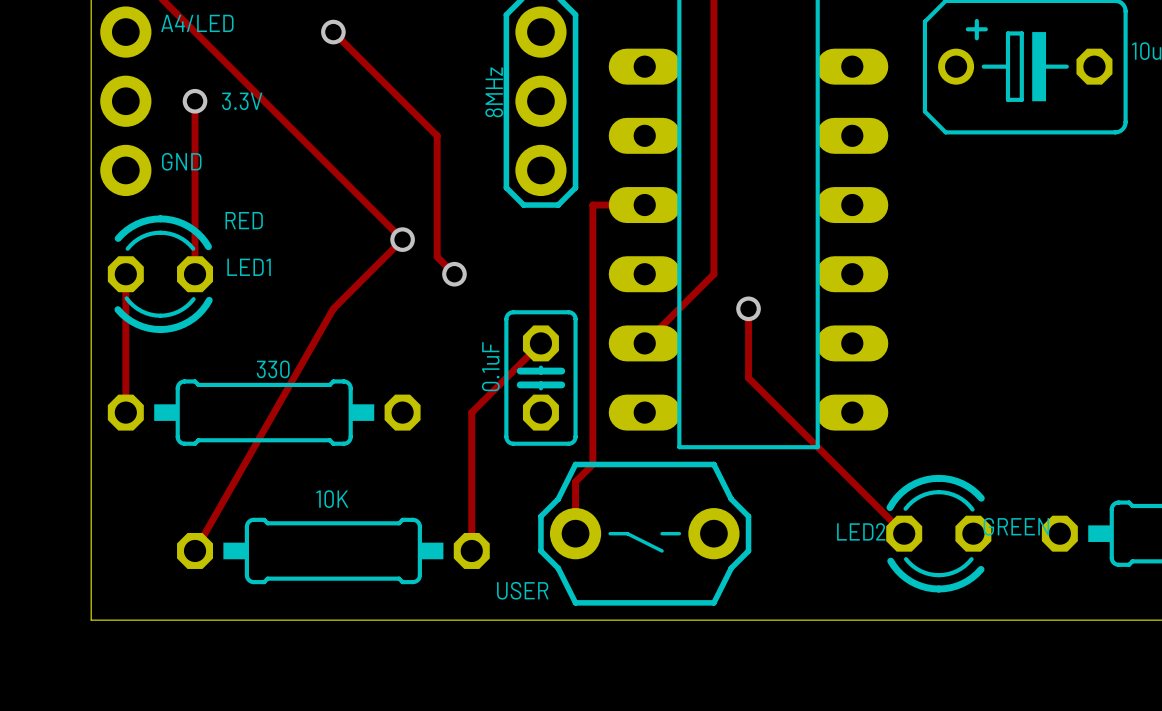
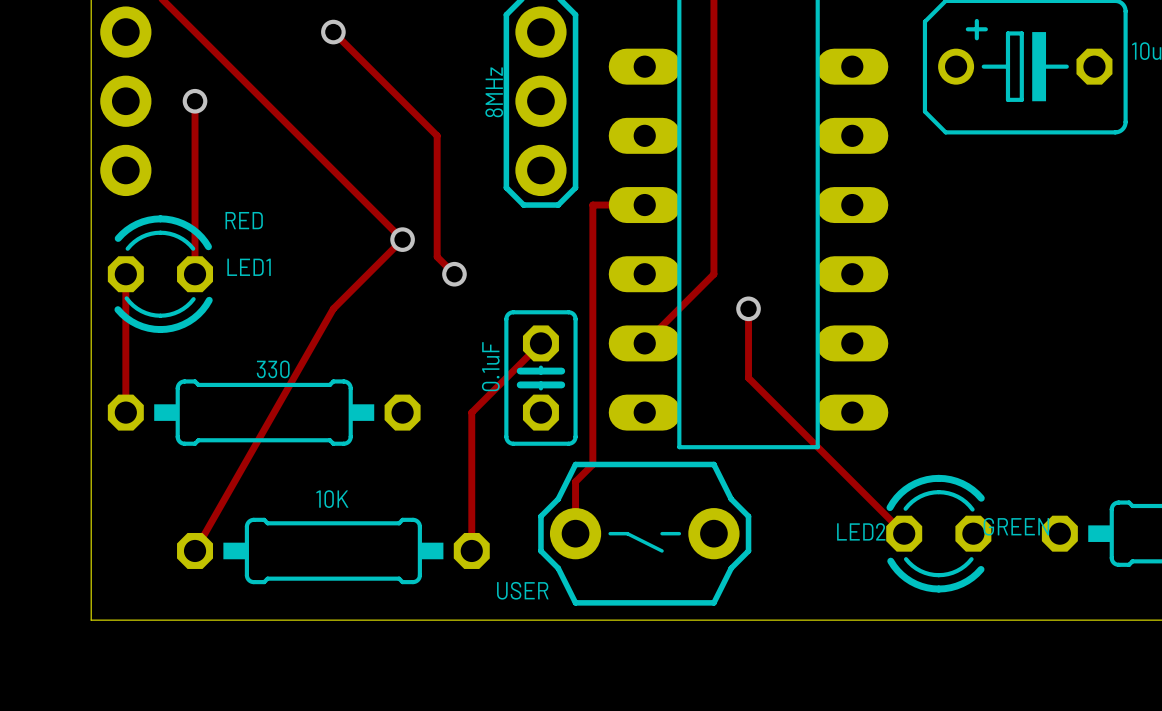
text: A4/LED (197, 23) -> none
text: 3.3V (242, 101) -> none
text: GND (181, 161) -> none

